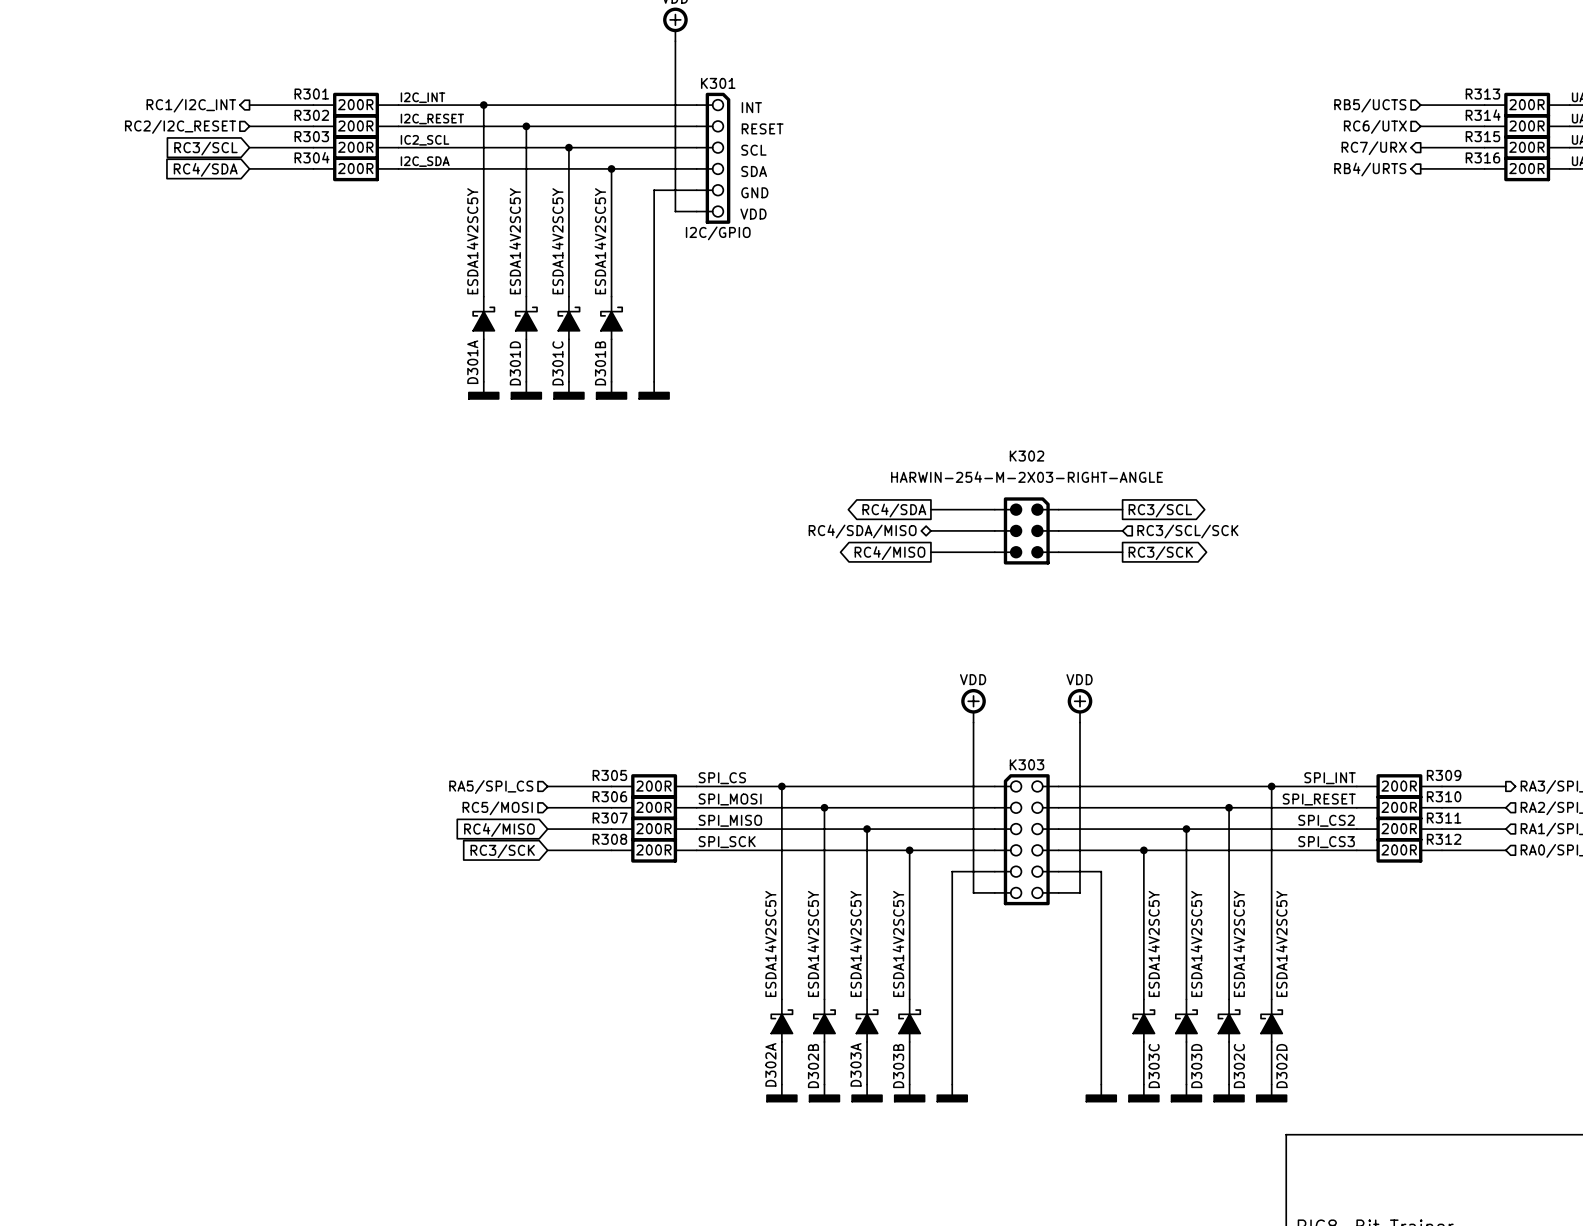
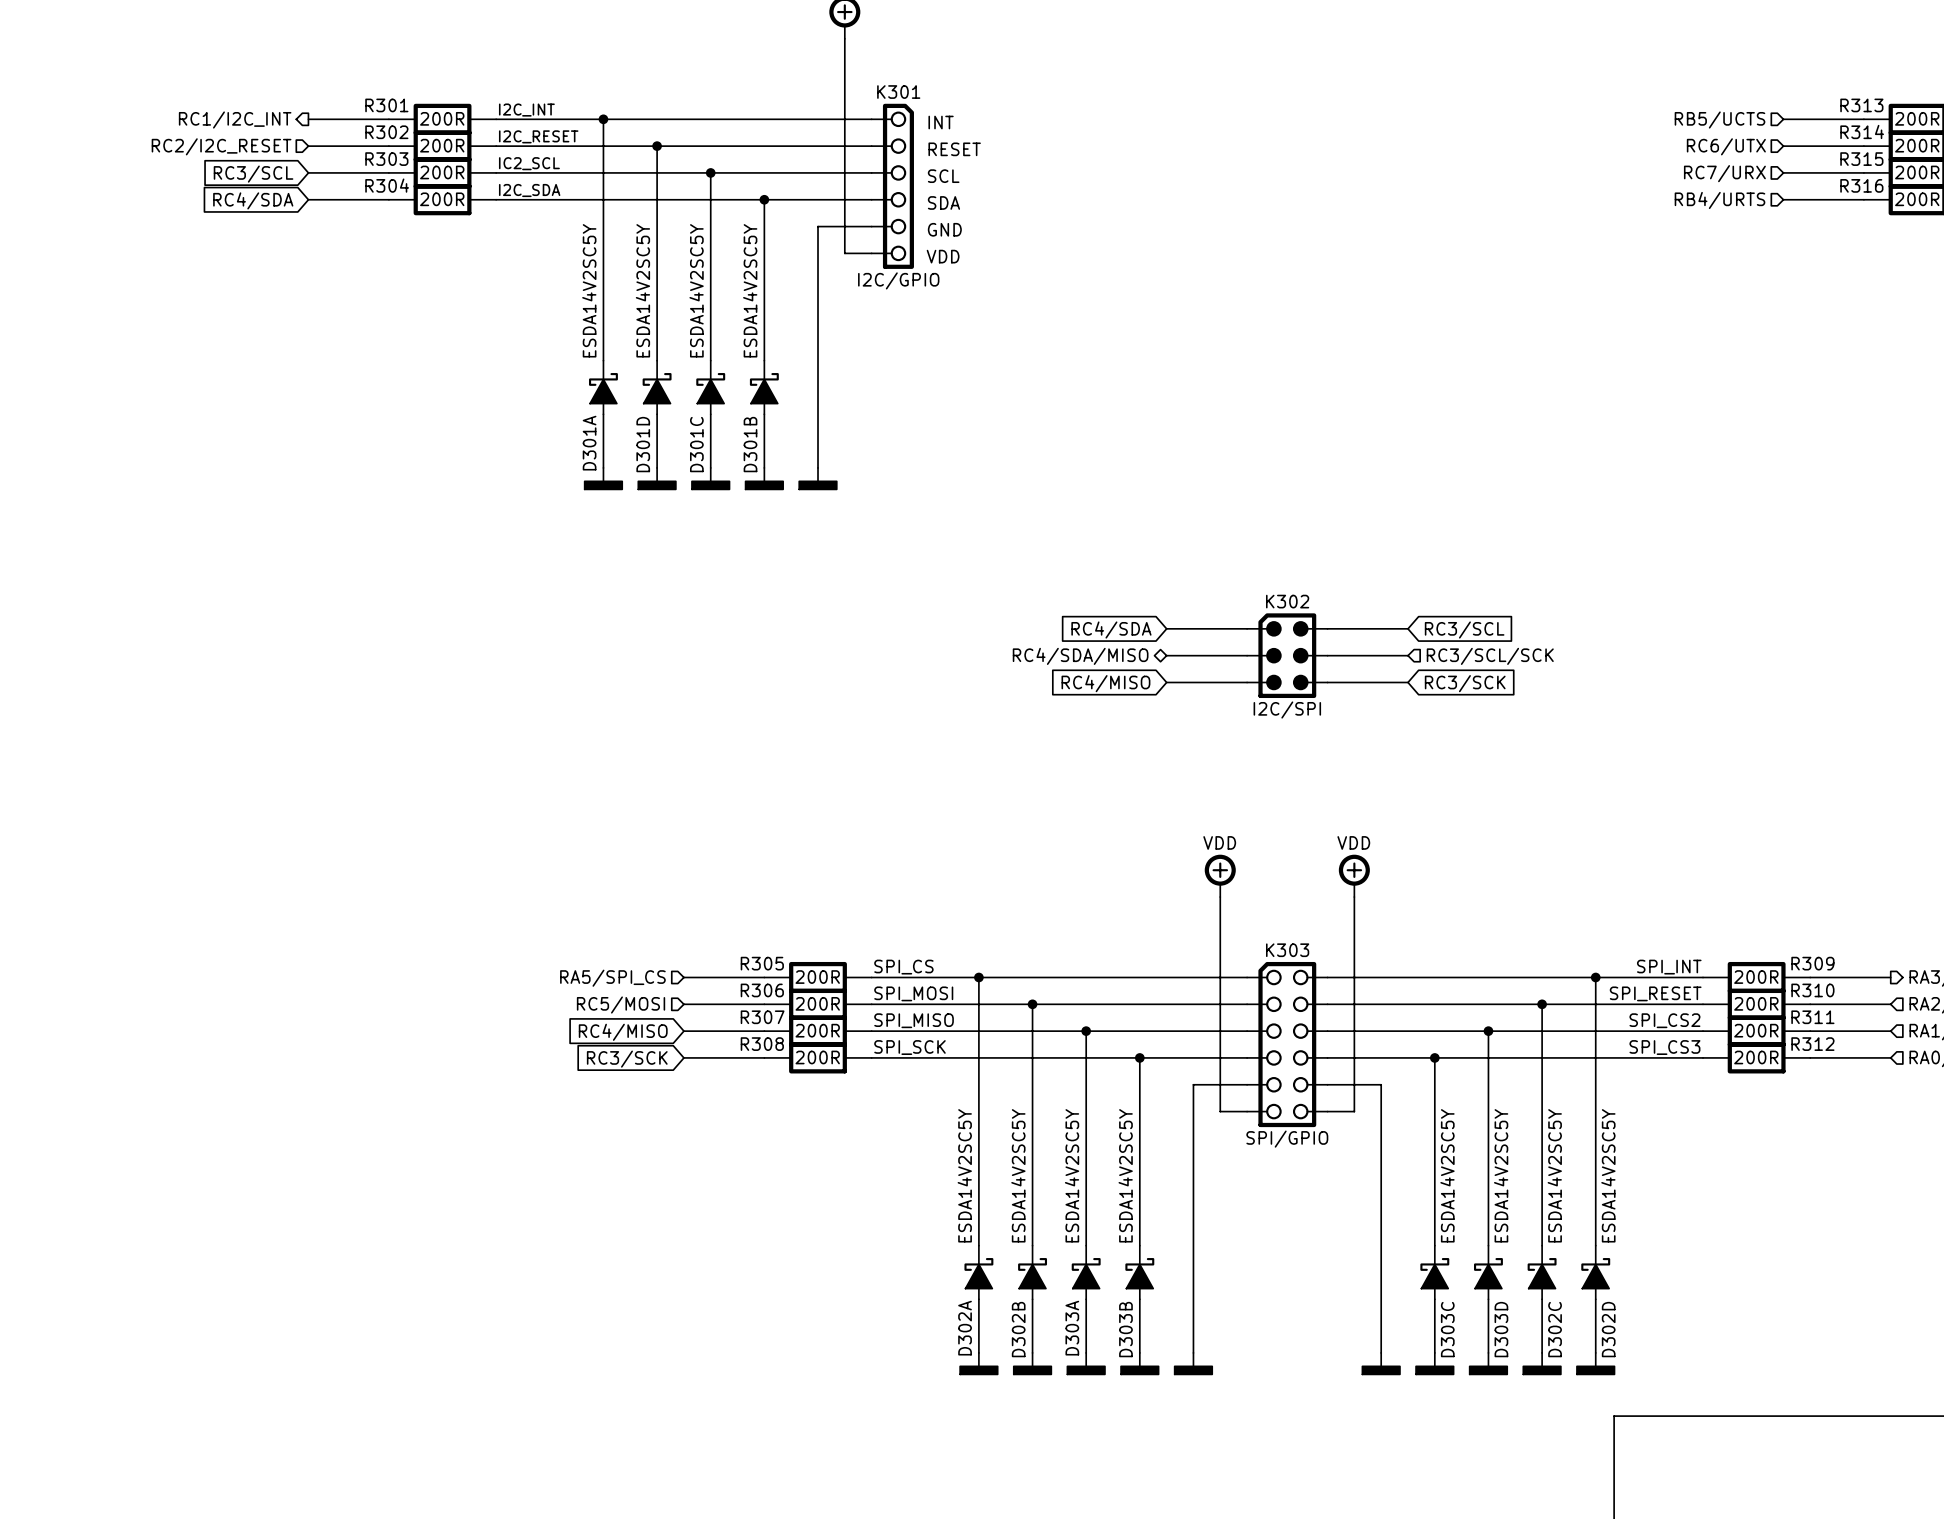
hierarchical label shape: output (1374, 148) -> input (1724, 173)
hierarchical label shape: output (1370, 169) -> input (1719, 200)
K302 name position: K302 (1026, 456) -> K302 (1287, 601)
K302 value: HARWIN-254-M-2X03-RIGHT-ANGLE (1026, 477) -> I2C/SPI (1287, 710)
global label shape: output (894, 510) -> input (1111, 630)
global label shape: output (1160, 510) -> input (1464, 630)
K302 flip: as is (1026, 530) -> left-right (1287, 655)
global label shape: output (889, 553) -> input (1105, 683)
global label shape: output (1160, 553) -> input (1465, 683)
K303 value: none -> SPI/GPIO (1287, 1139)

